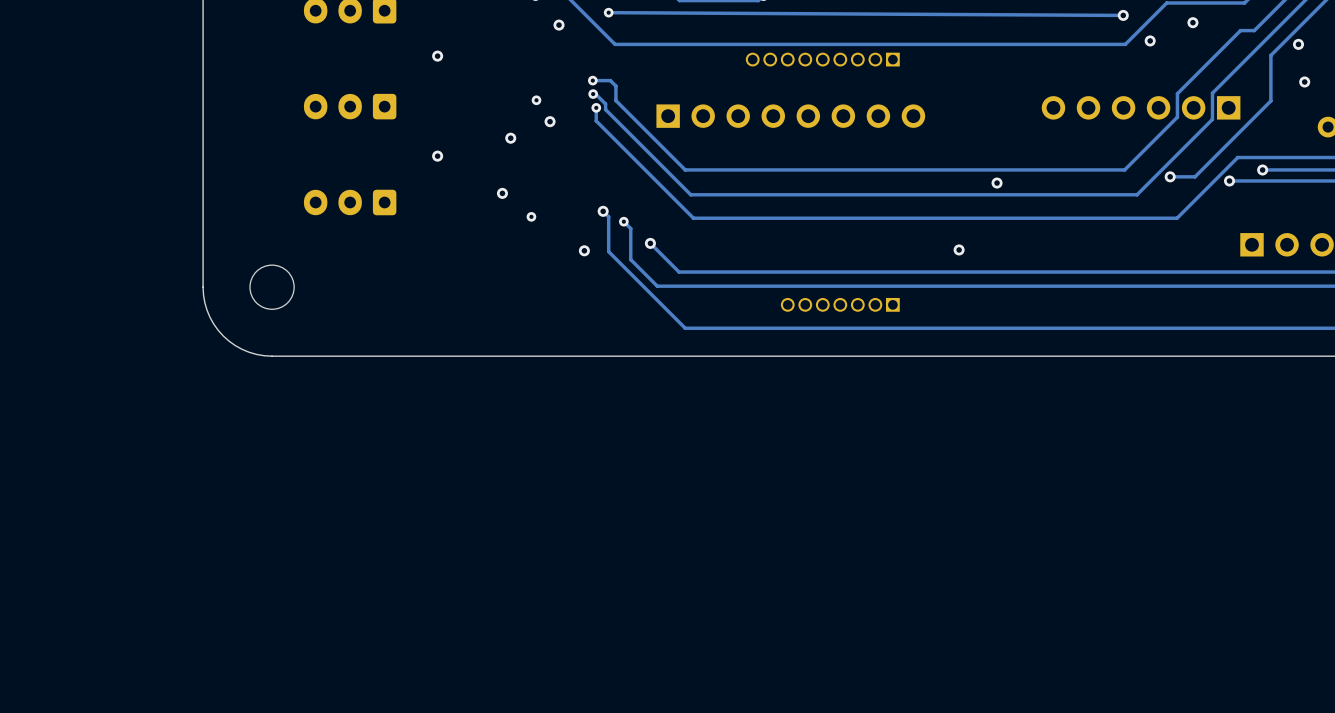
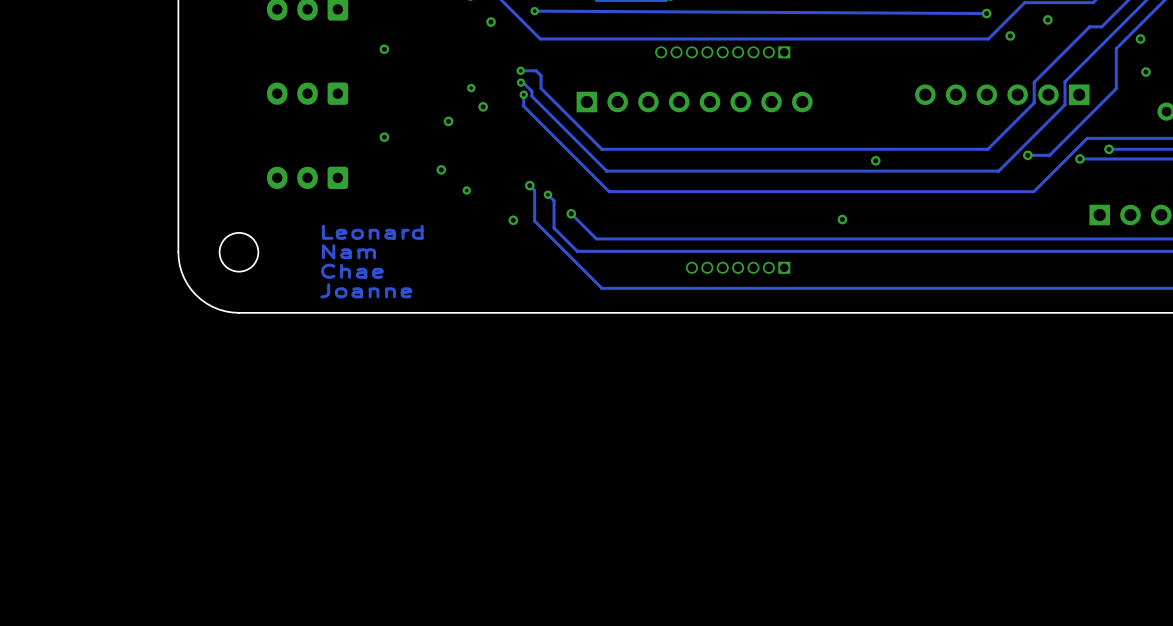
text: none -> Leonard (372, 232)
text: none -> Nam (348, 251)
text: none -> Chae (352, 271)
text: none -> Joanne (366, 290)

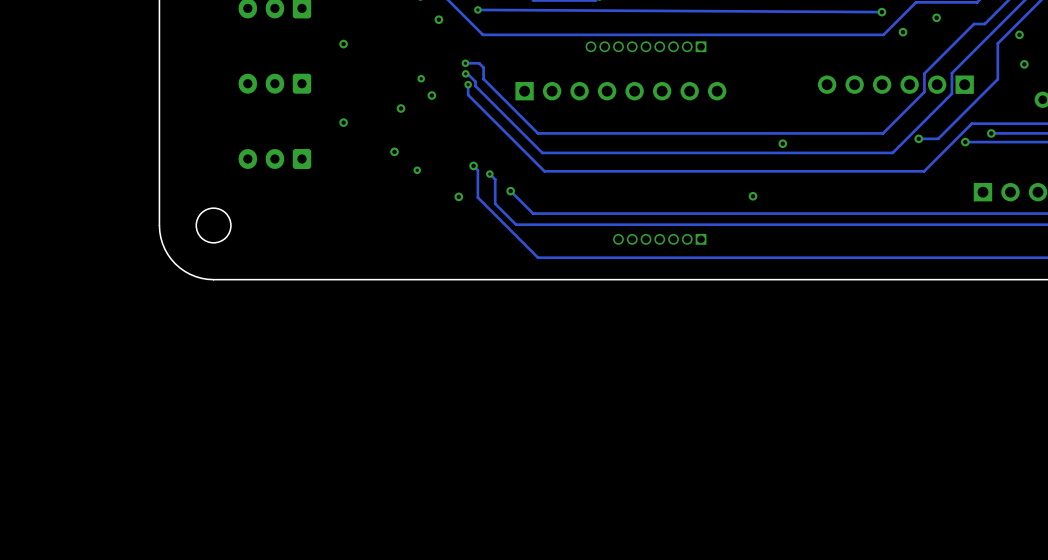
text: Leonard (372, 232) -> none
text: Nam (348, 251) -> none
text: Chae (352, 271) -> none
text: Joanne (366, 290) -> none

